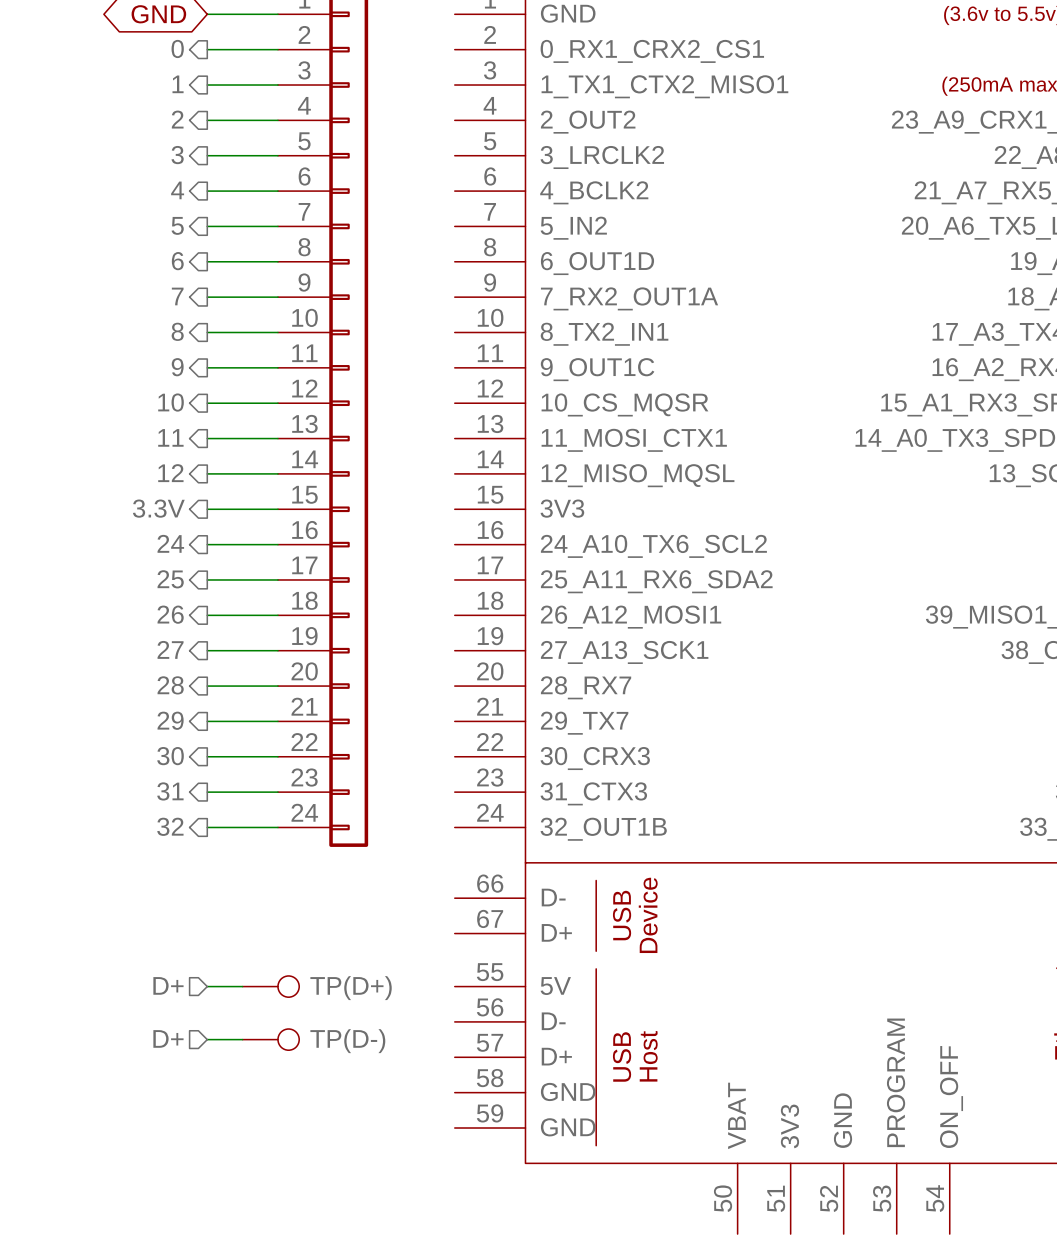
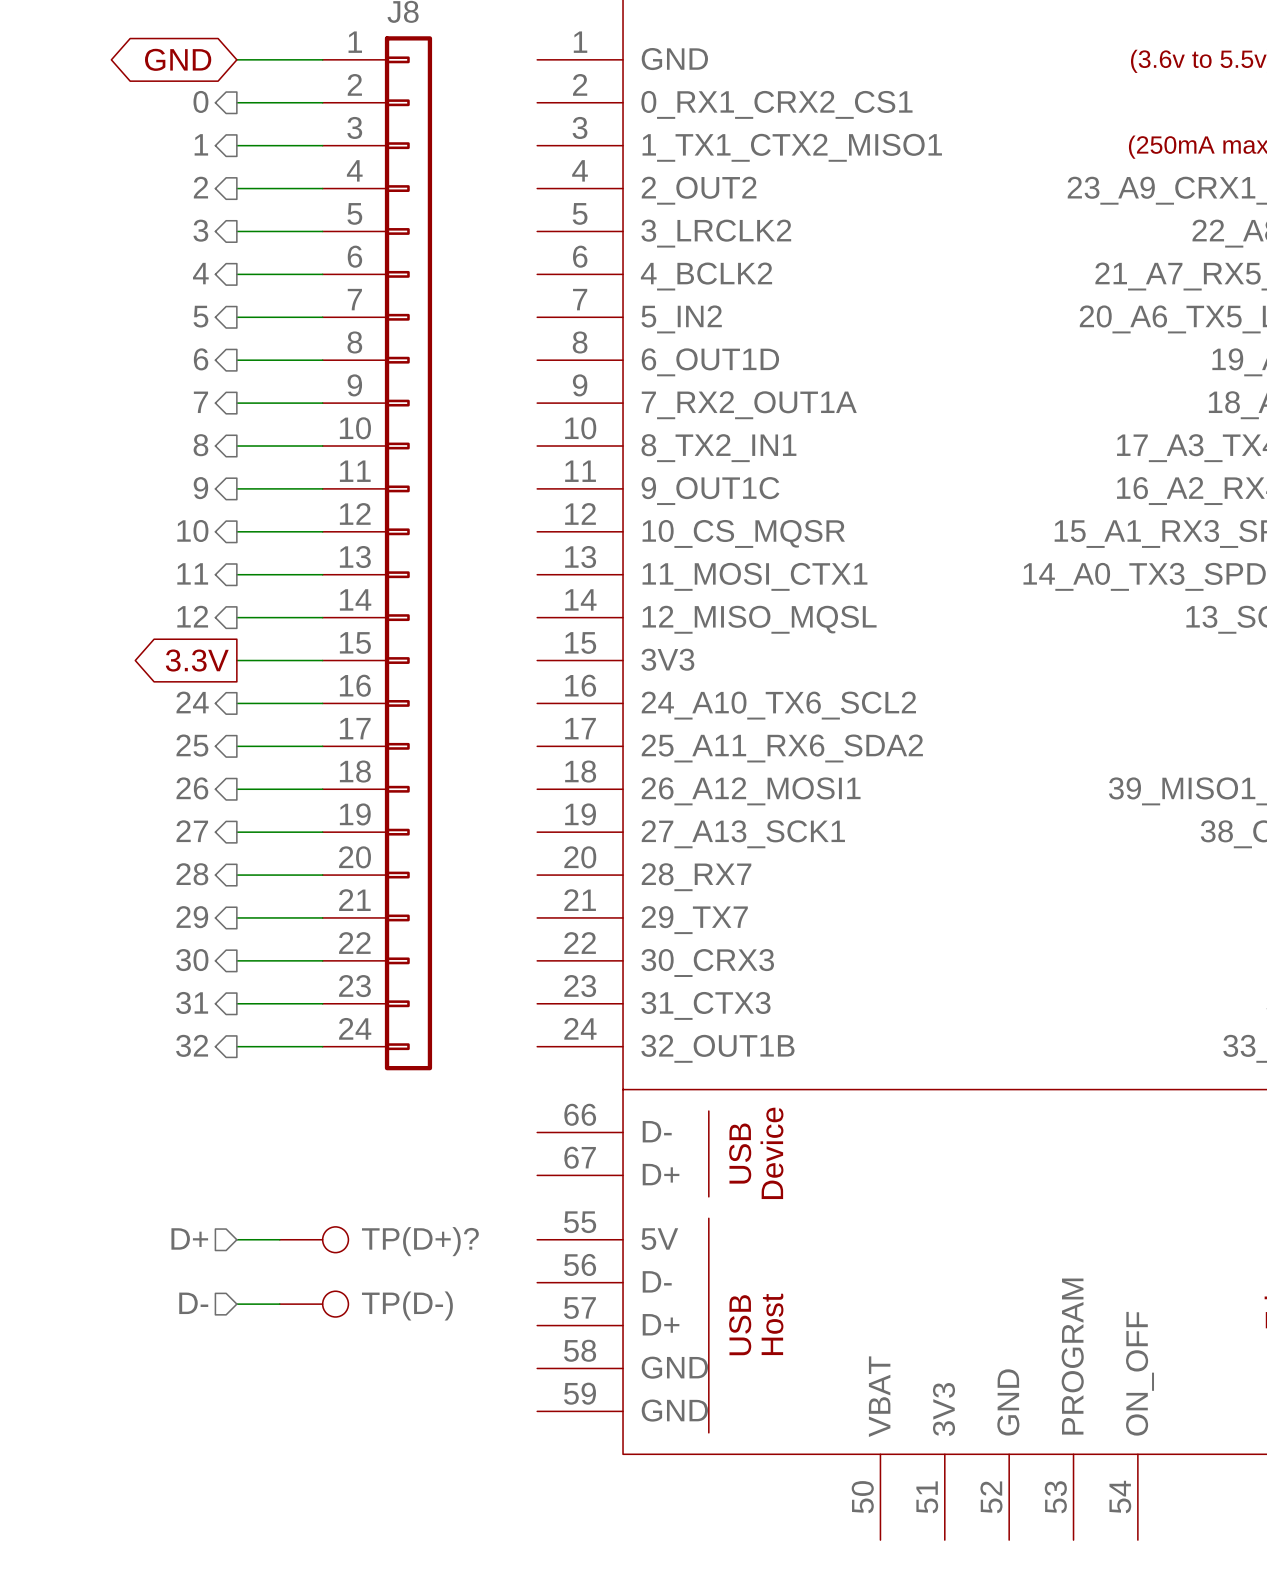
hierarchical label: 3.3V (158, 508) -> none
global label: none -> 3.3V (197, 660)
TP(D+) name: TP(D+) (351, 988) -> TP(D+)? (420, 1241)
hierarchical label: D+ (168, 1038) -> D- (193, 1303)

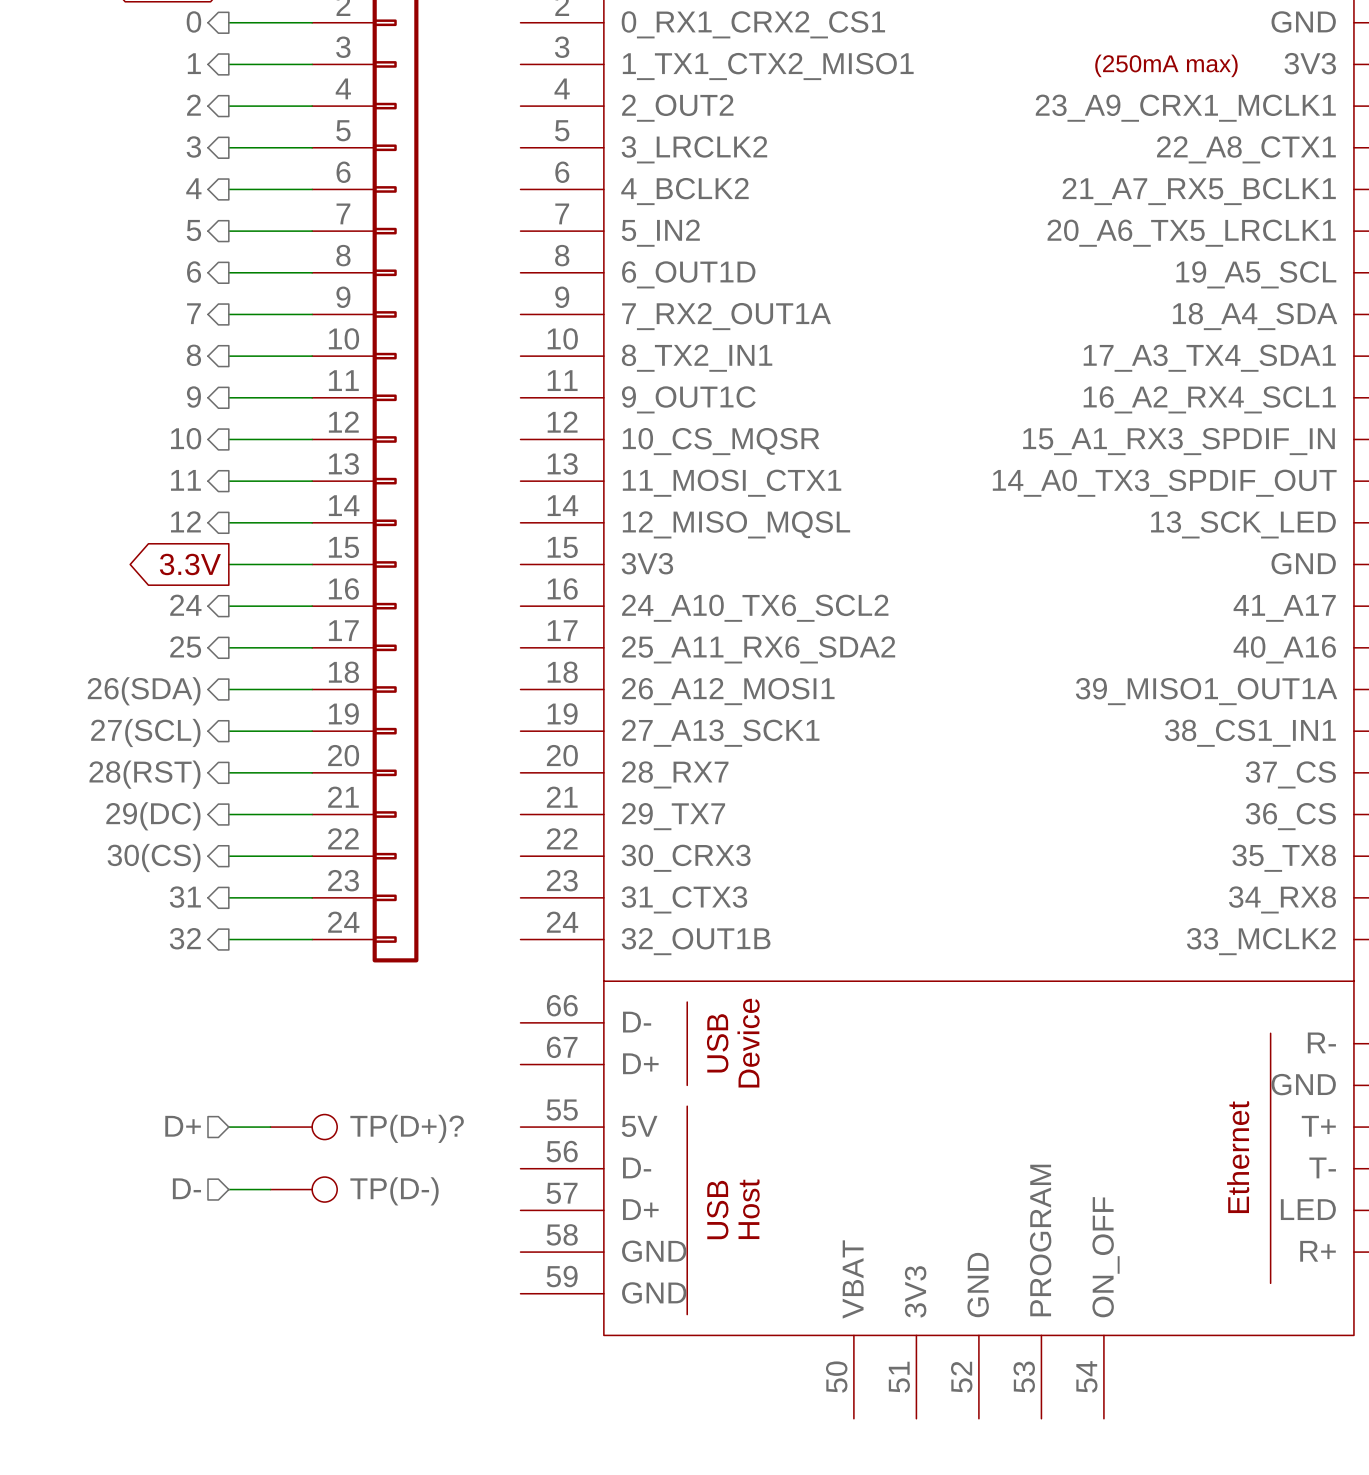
hierarchical label: 26 (192, 788) -> 26(SDA) (144, 691)
hierarchical label: 27 (192, 831) -> 27(SCL) (145, 732)
hierarchical label: 28 (192, 874) -> 28(RST) (144, 774)
hierarchical label: 29 (192, 917) -> 29(DC) (153, 816)
hierarchical label: 30 (192, 960) -> 30(CS) (154, 857)

